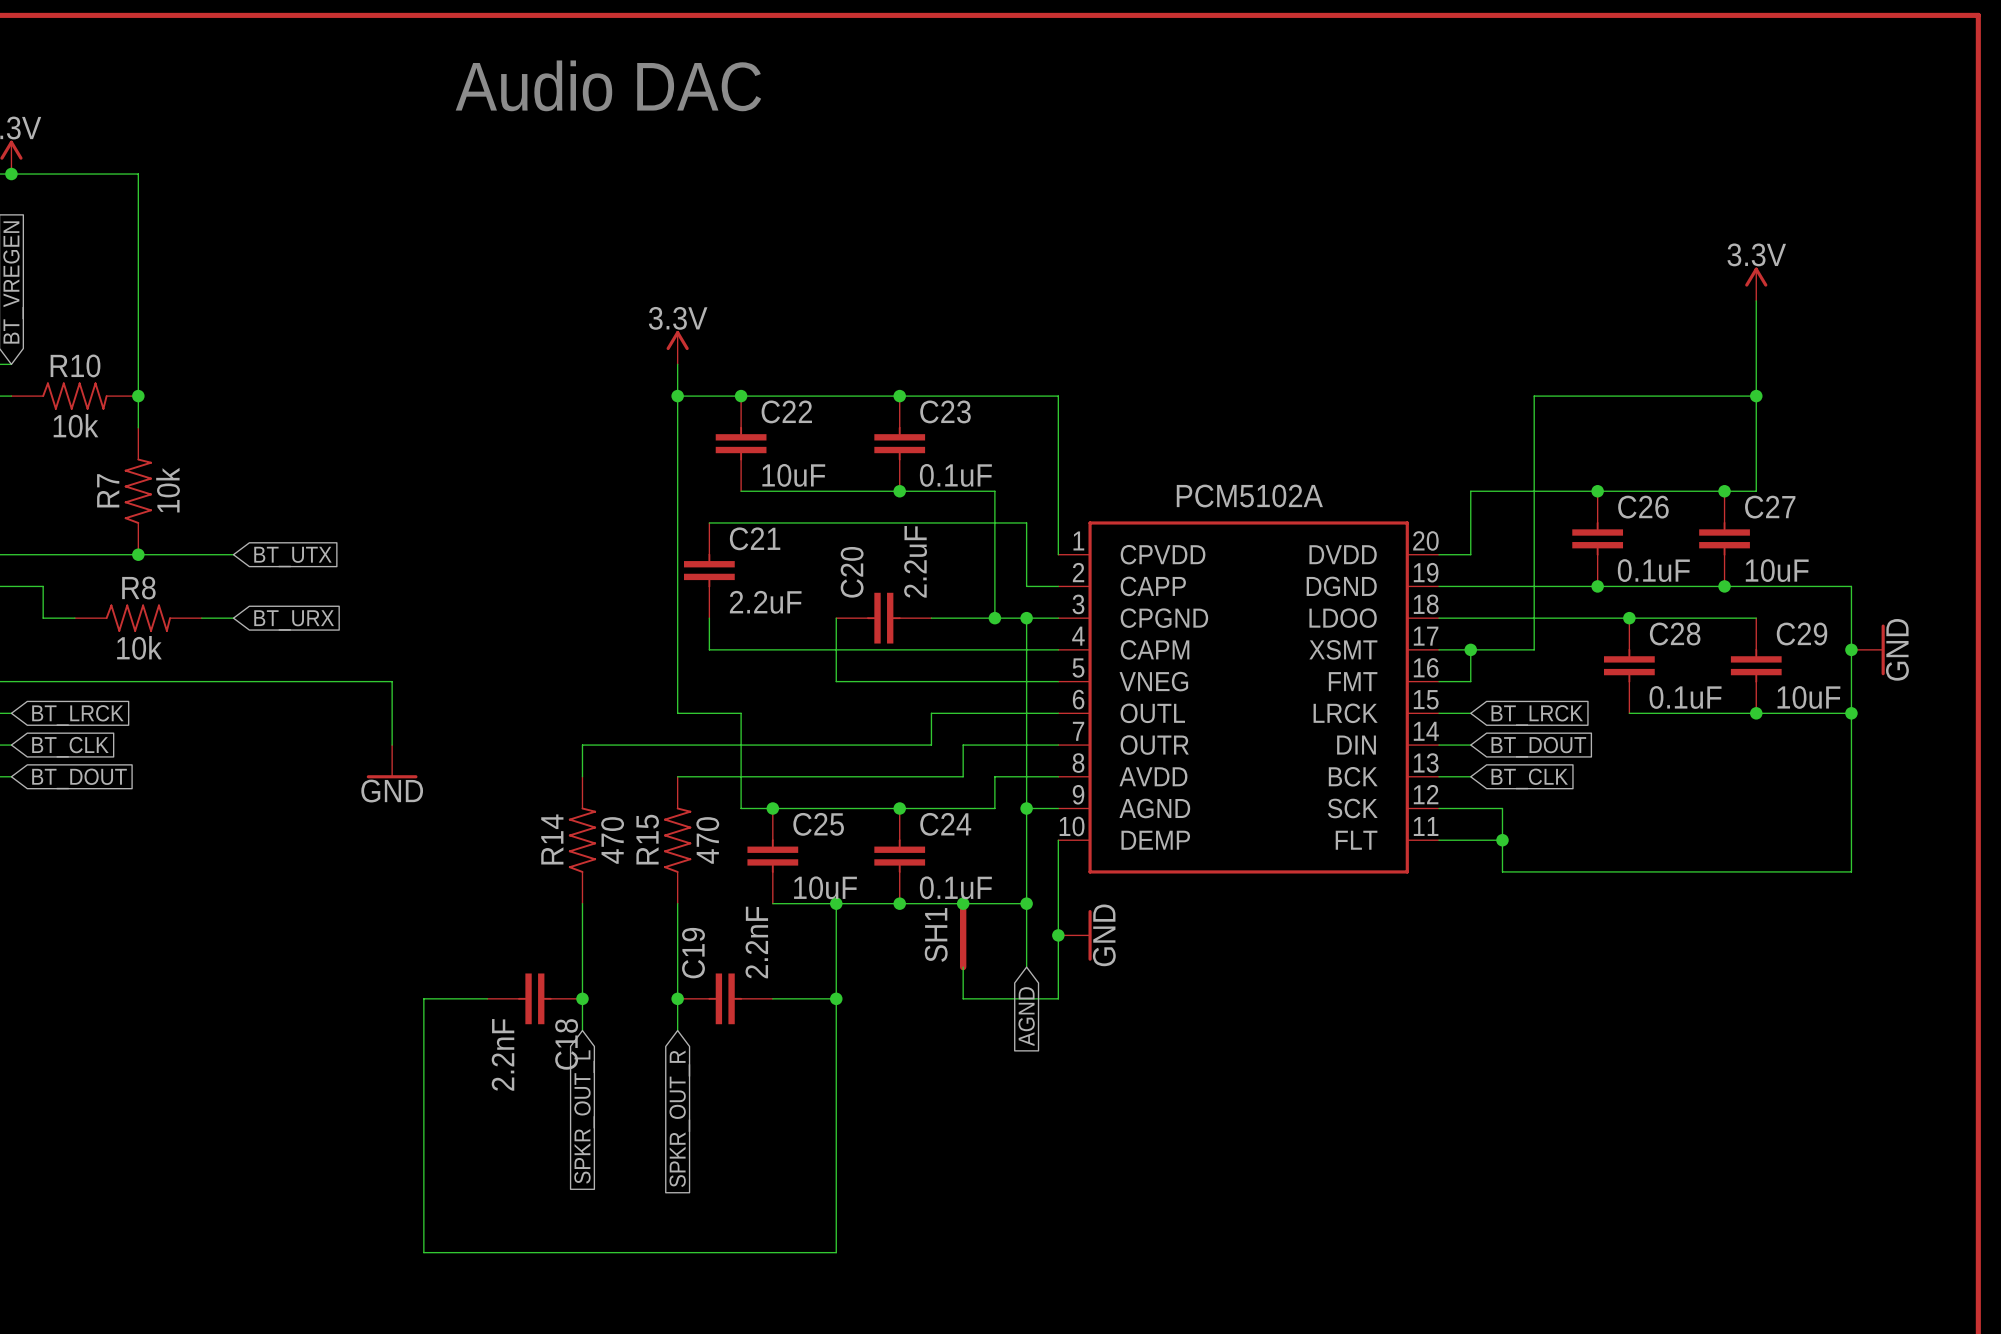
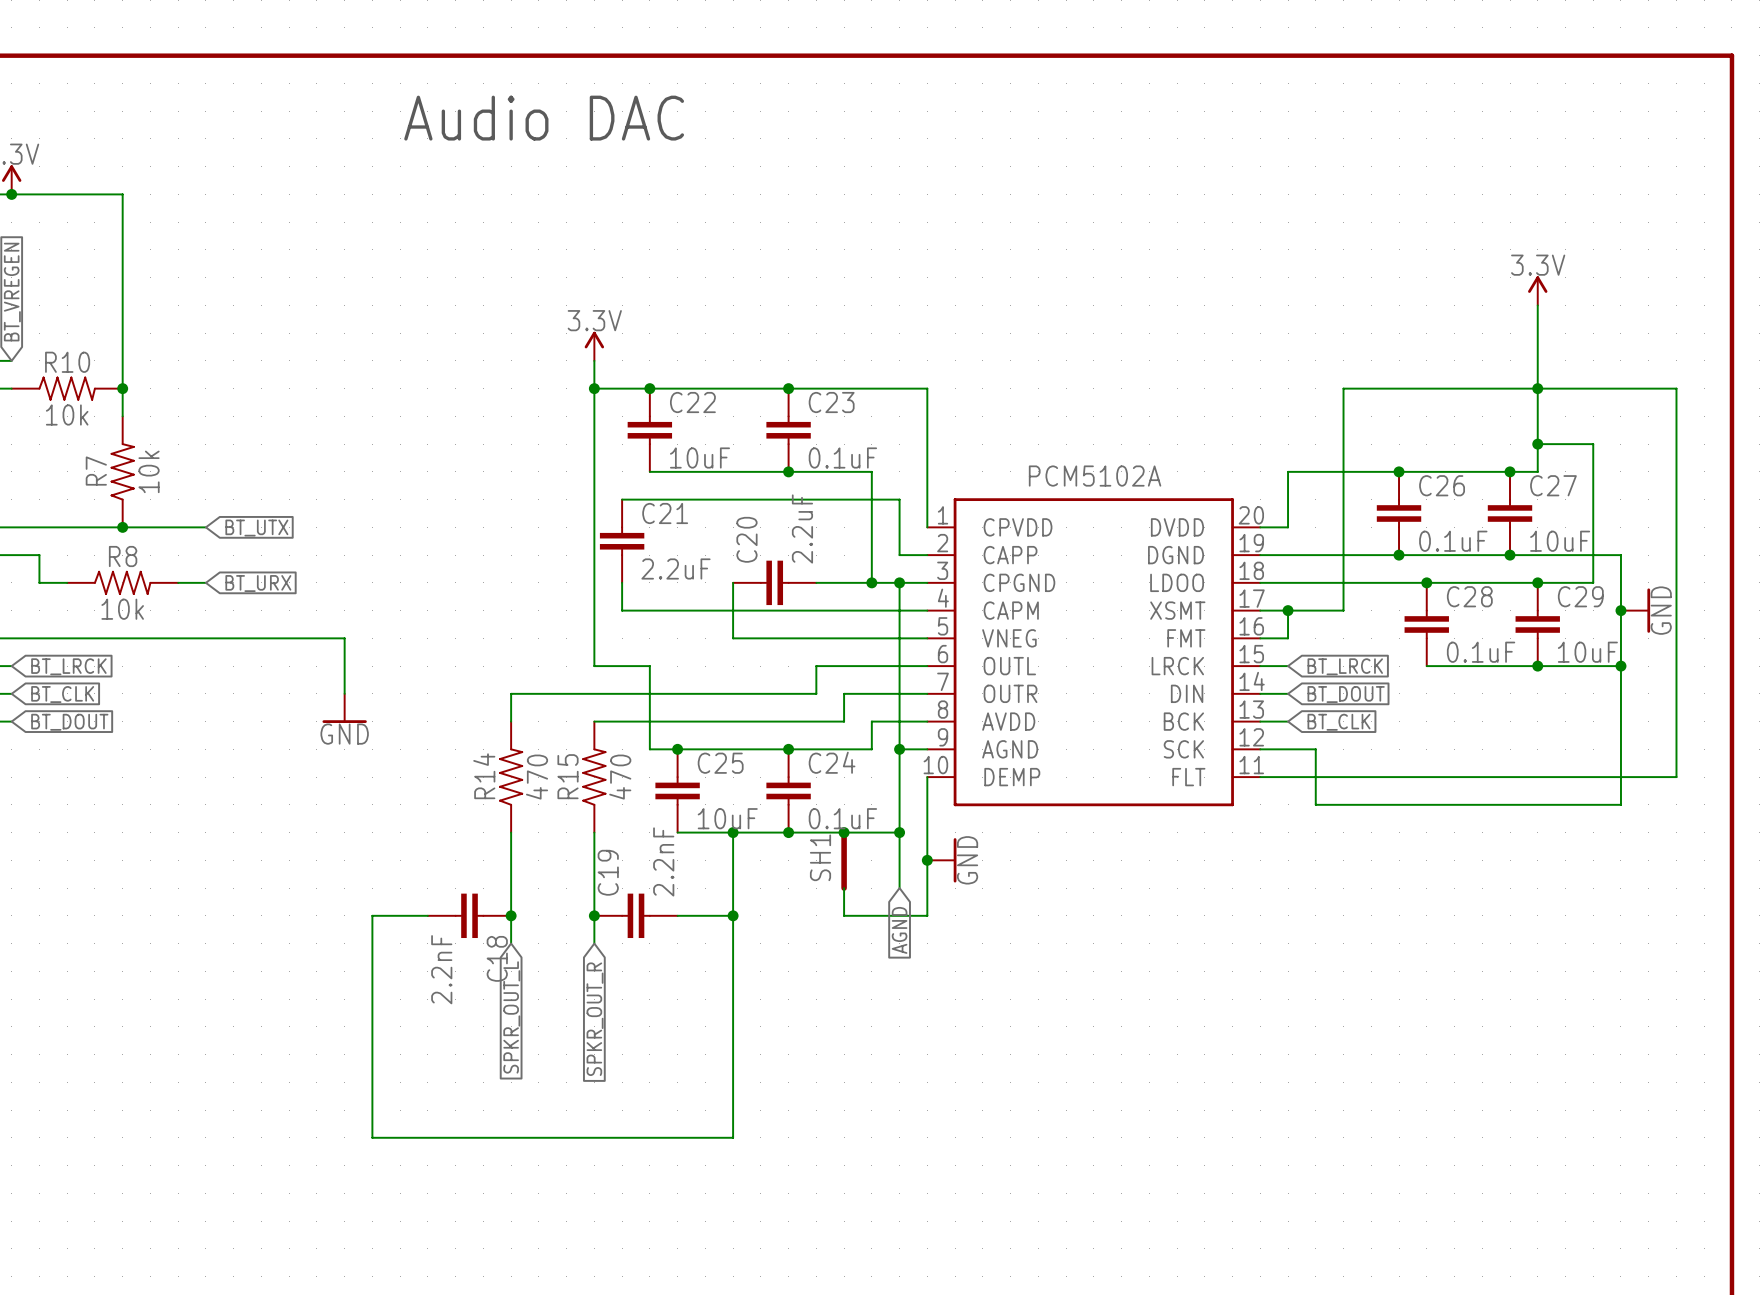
wire: none -> (1537, 388) (1676, 388) (1676, 777) (1315, 777)
wire: none -> (1537, 444) (1593, 444) (1593, 582) (1537, 582)
junction: none -> (1537, 444)
junction: none -> (1537, 582)
junction: (1502, 840) -> none

